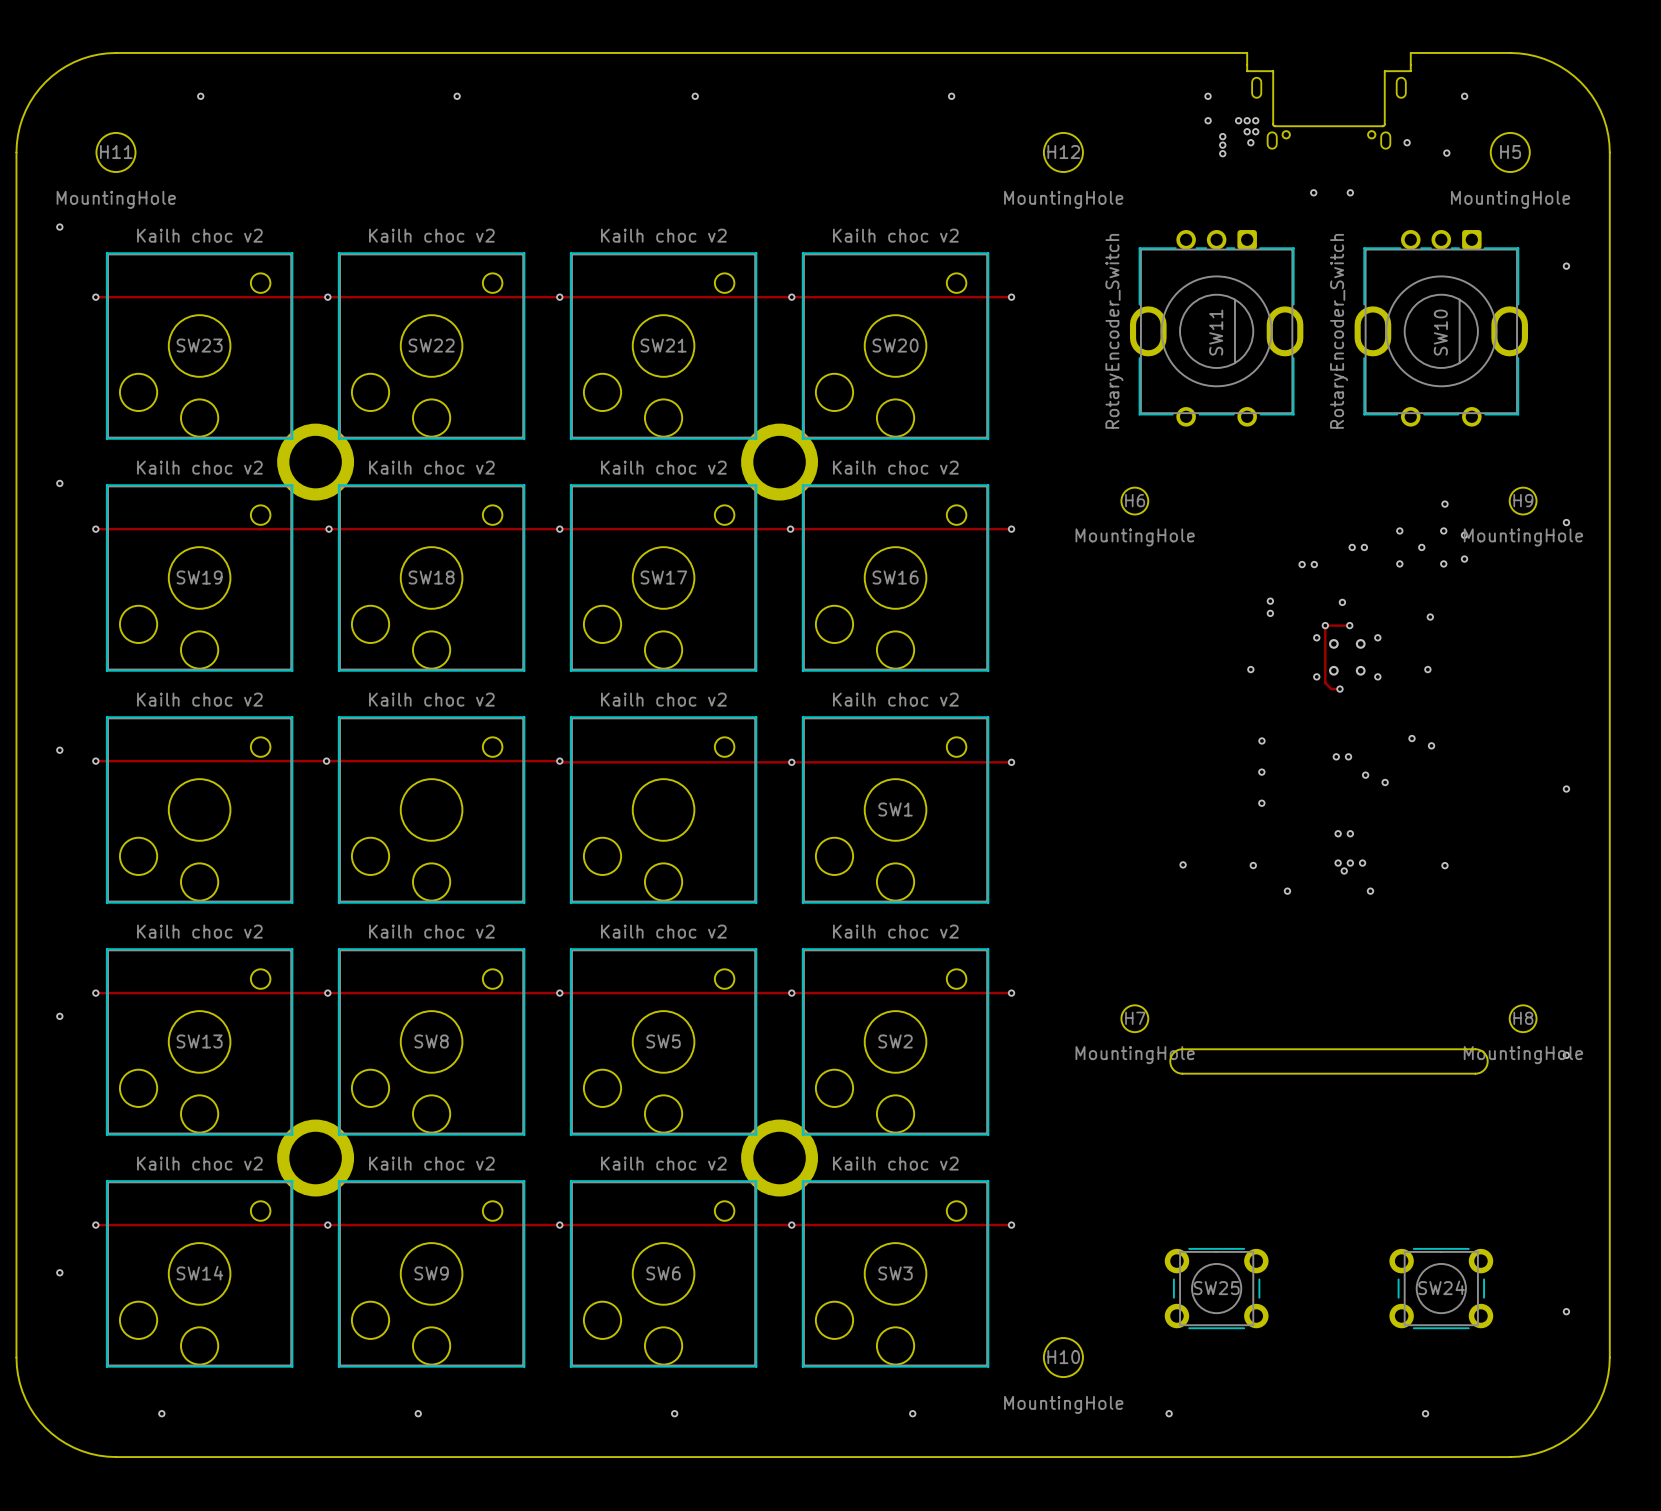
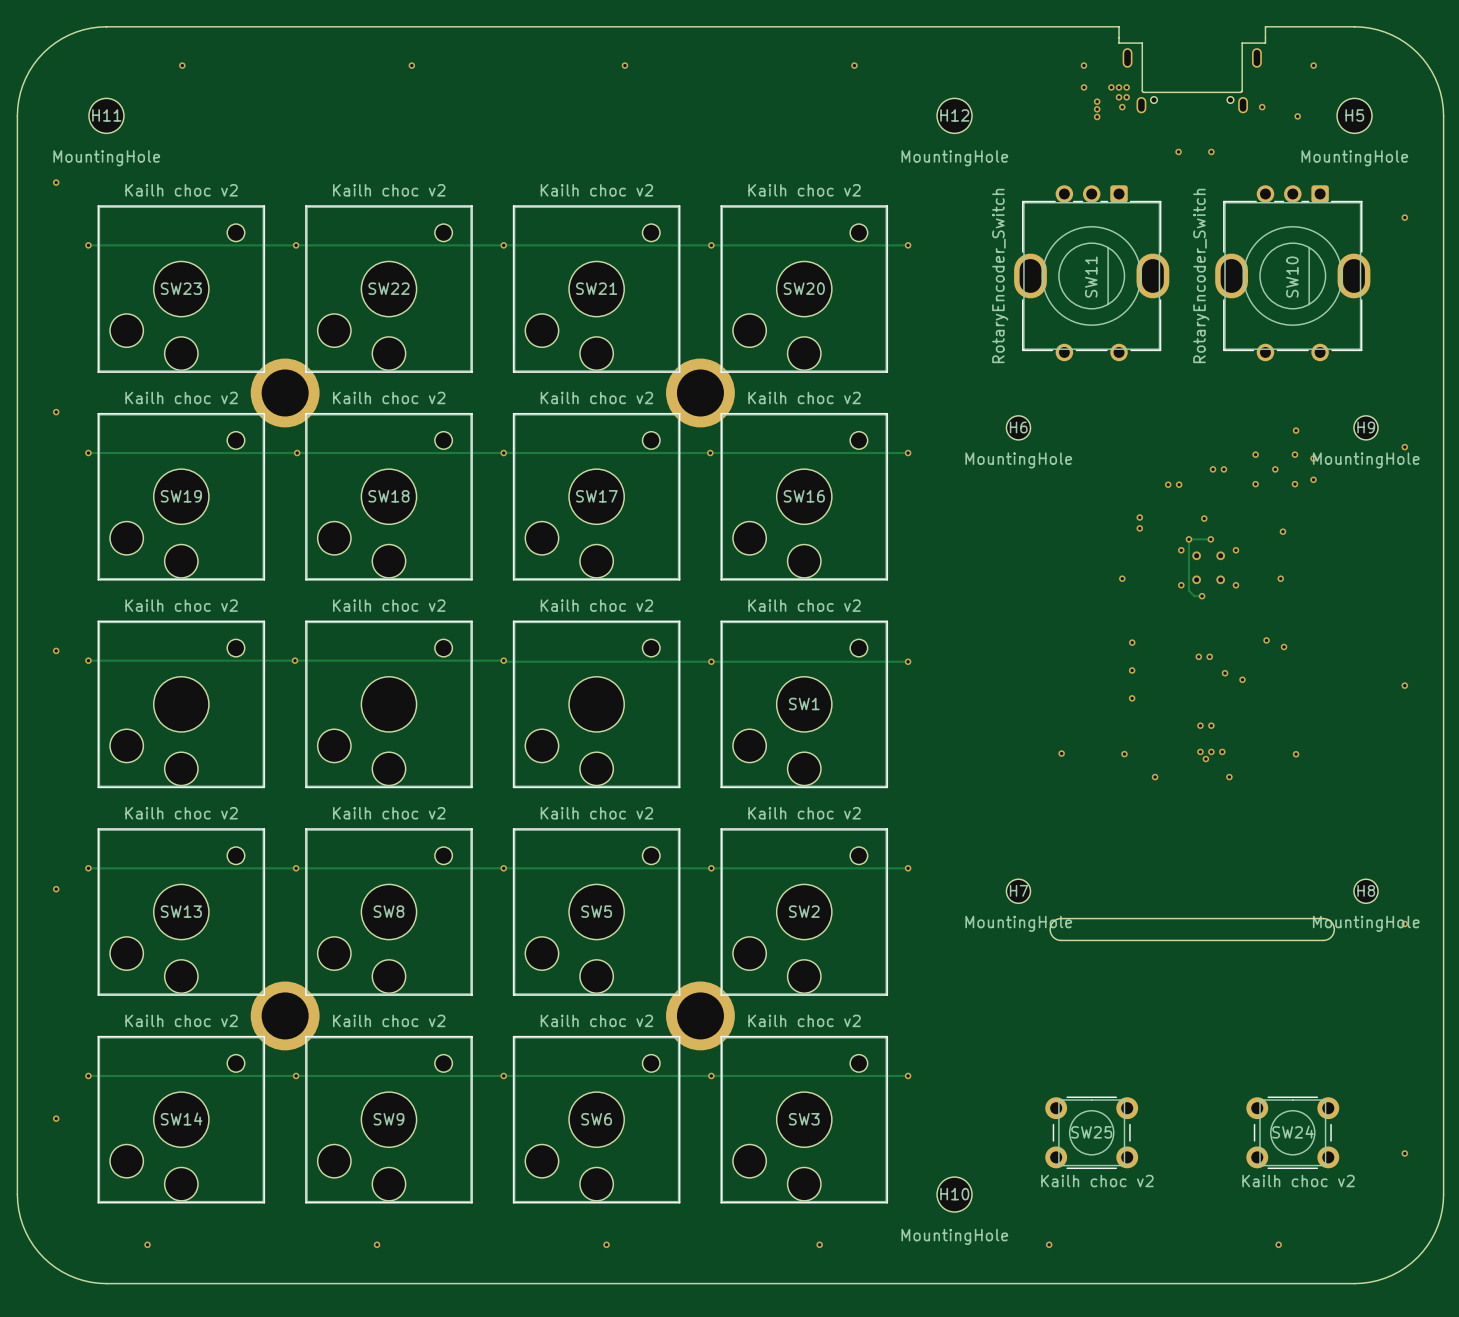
SW25 value: none -> Kailh choc v2 (1097, 1181)
SW24 value: none -> Kailh choc v2 (1298, 1181)

